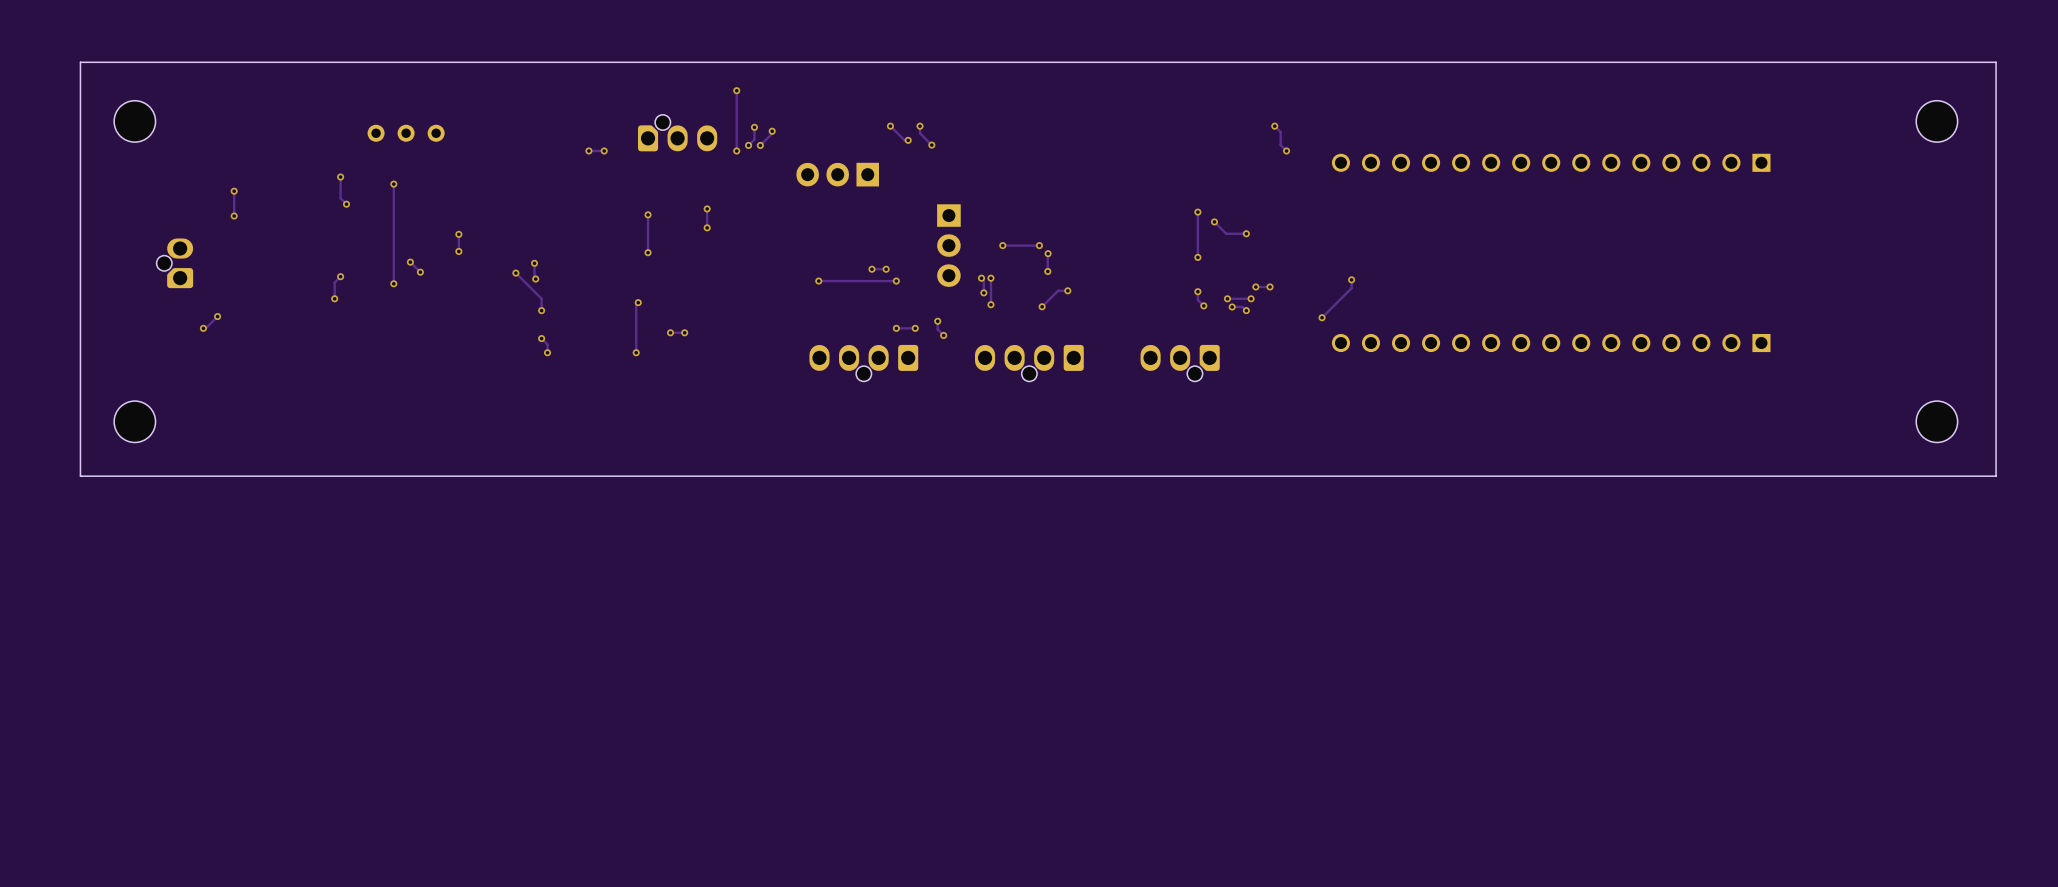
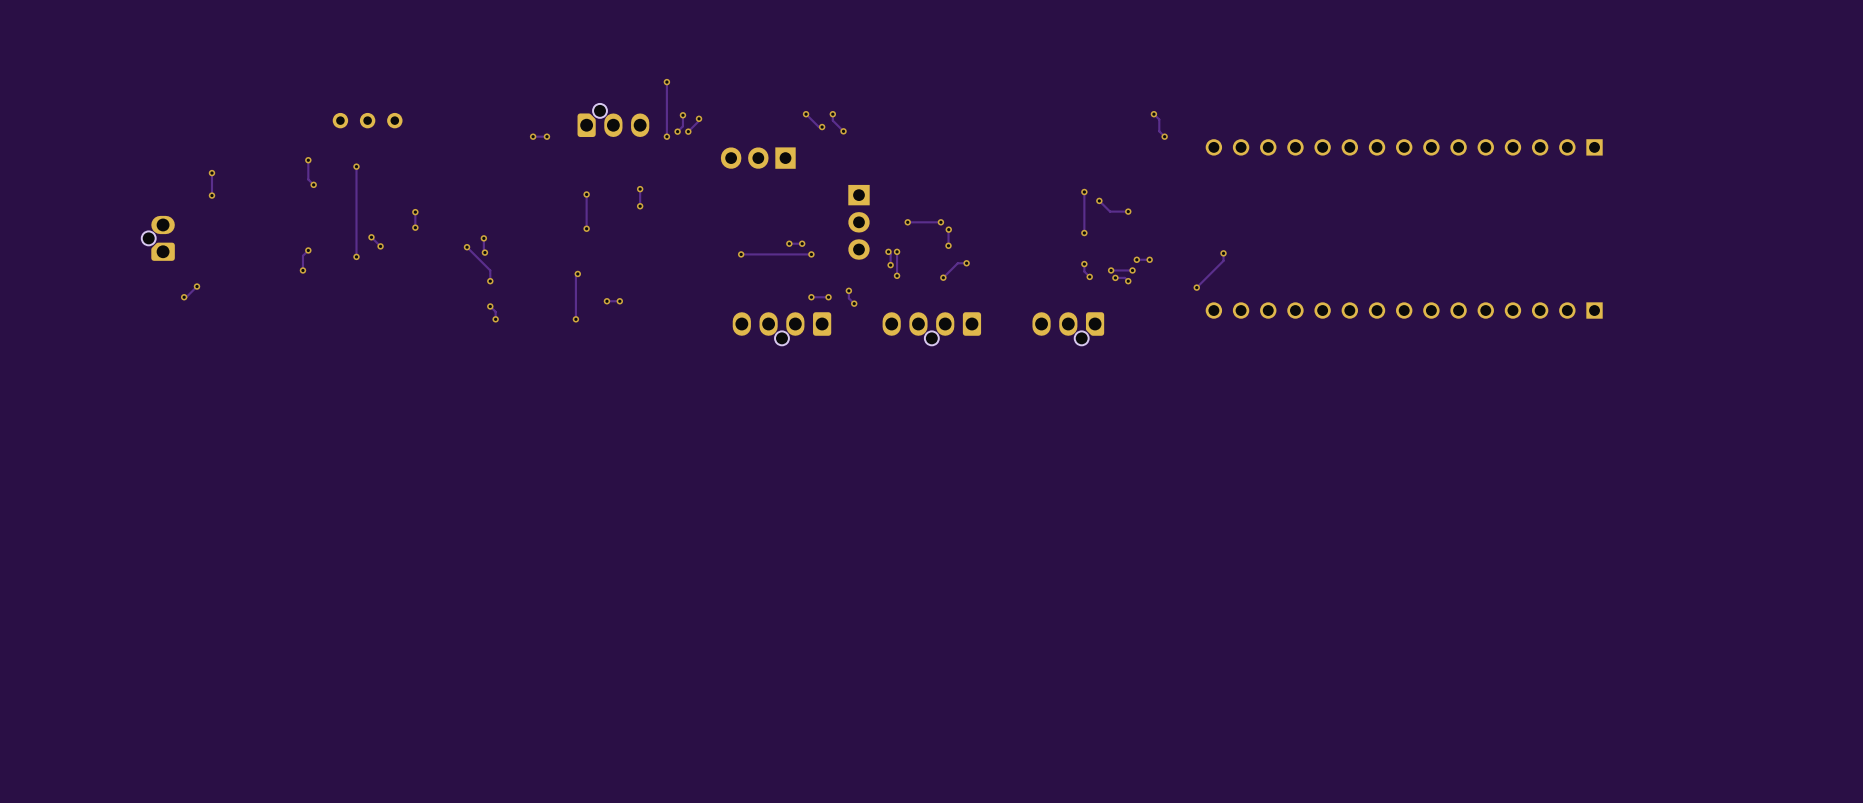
board edge: (1996, 62) (80, 62) (80, 476) (1996, 476) (1996, 62) -> none
part: (134, 121) -> none
part: (1936, 121) -> none
part: (134, 421) -> none
part: (1936, 421) -> none

